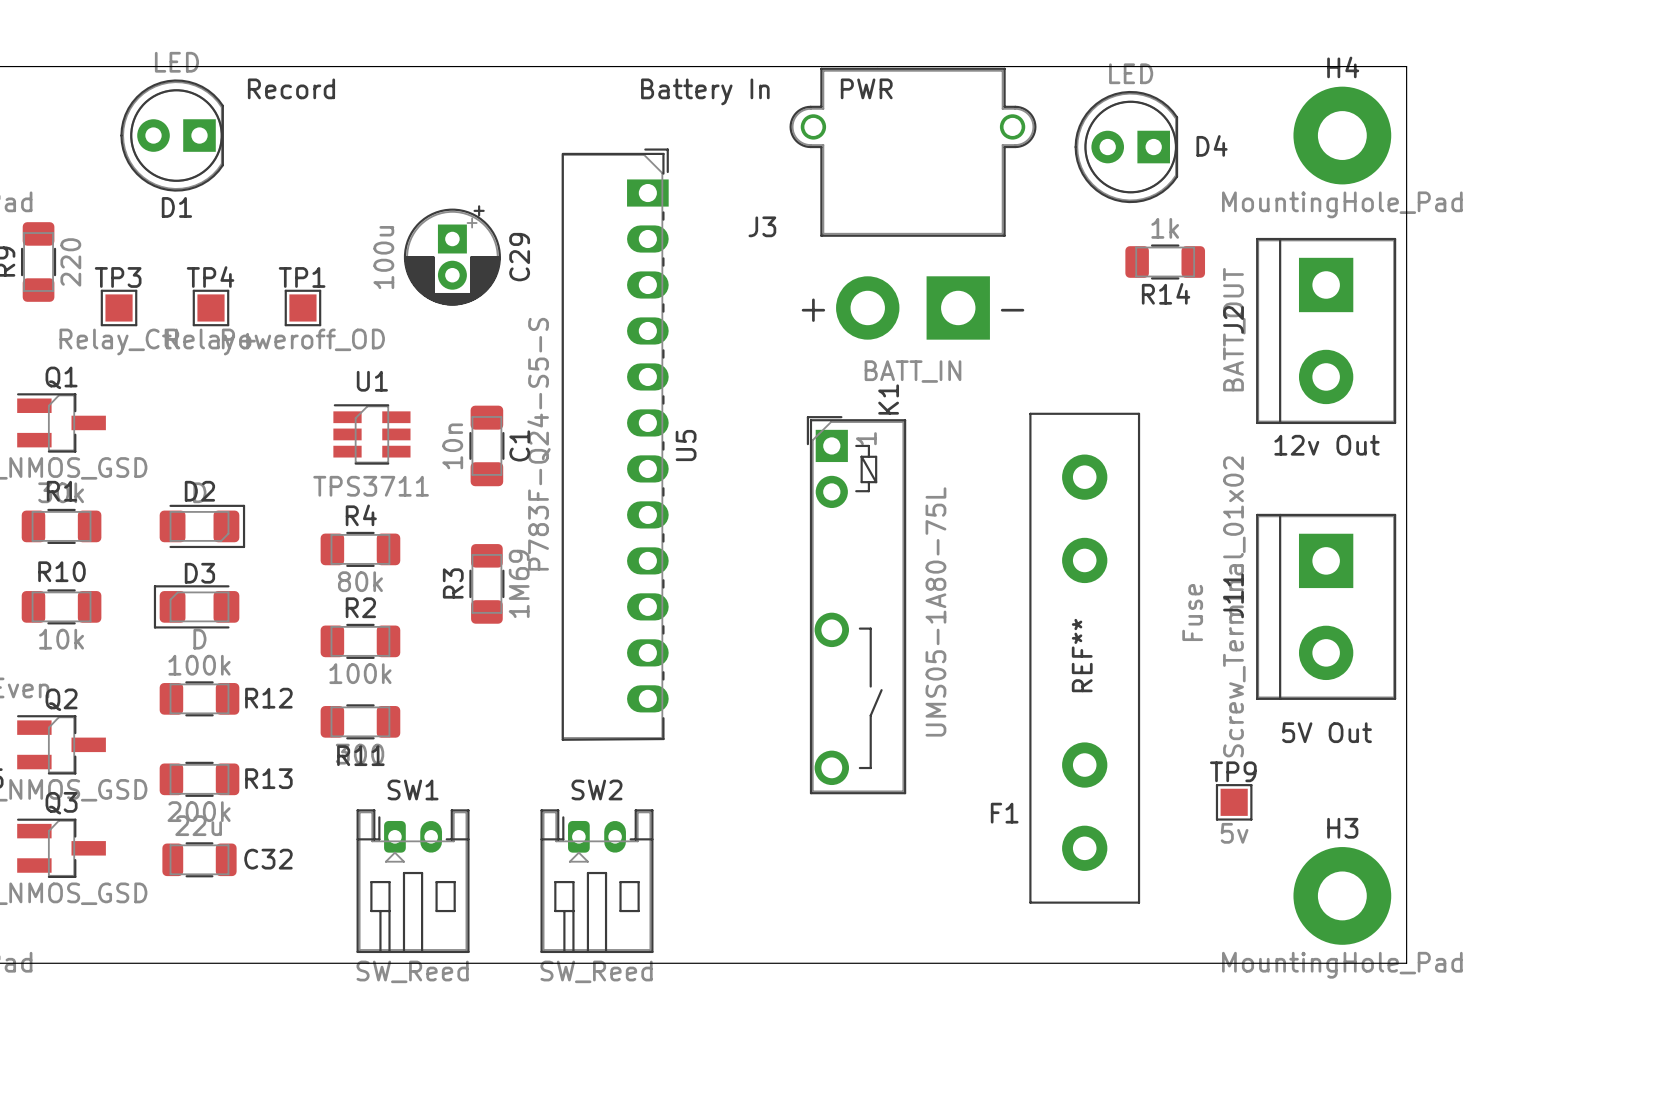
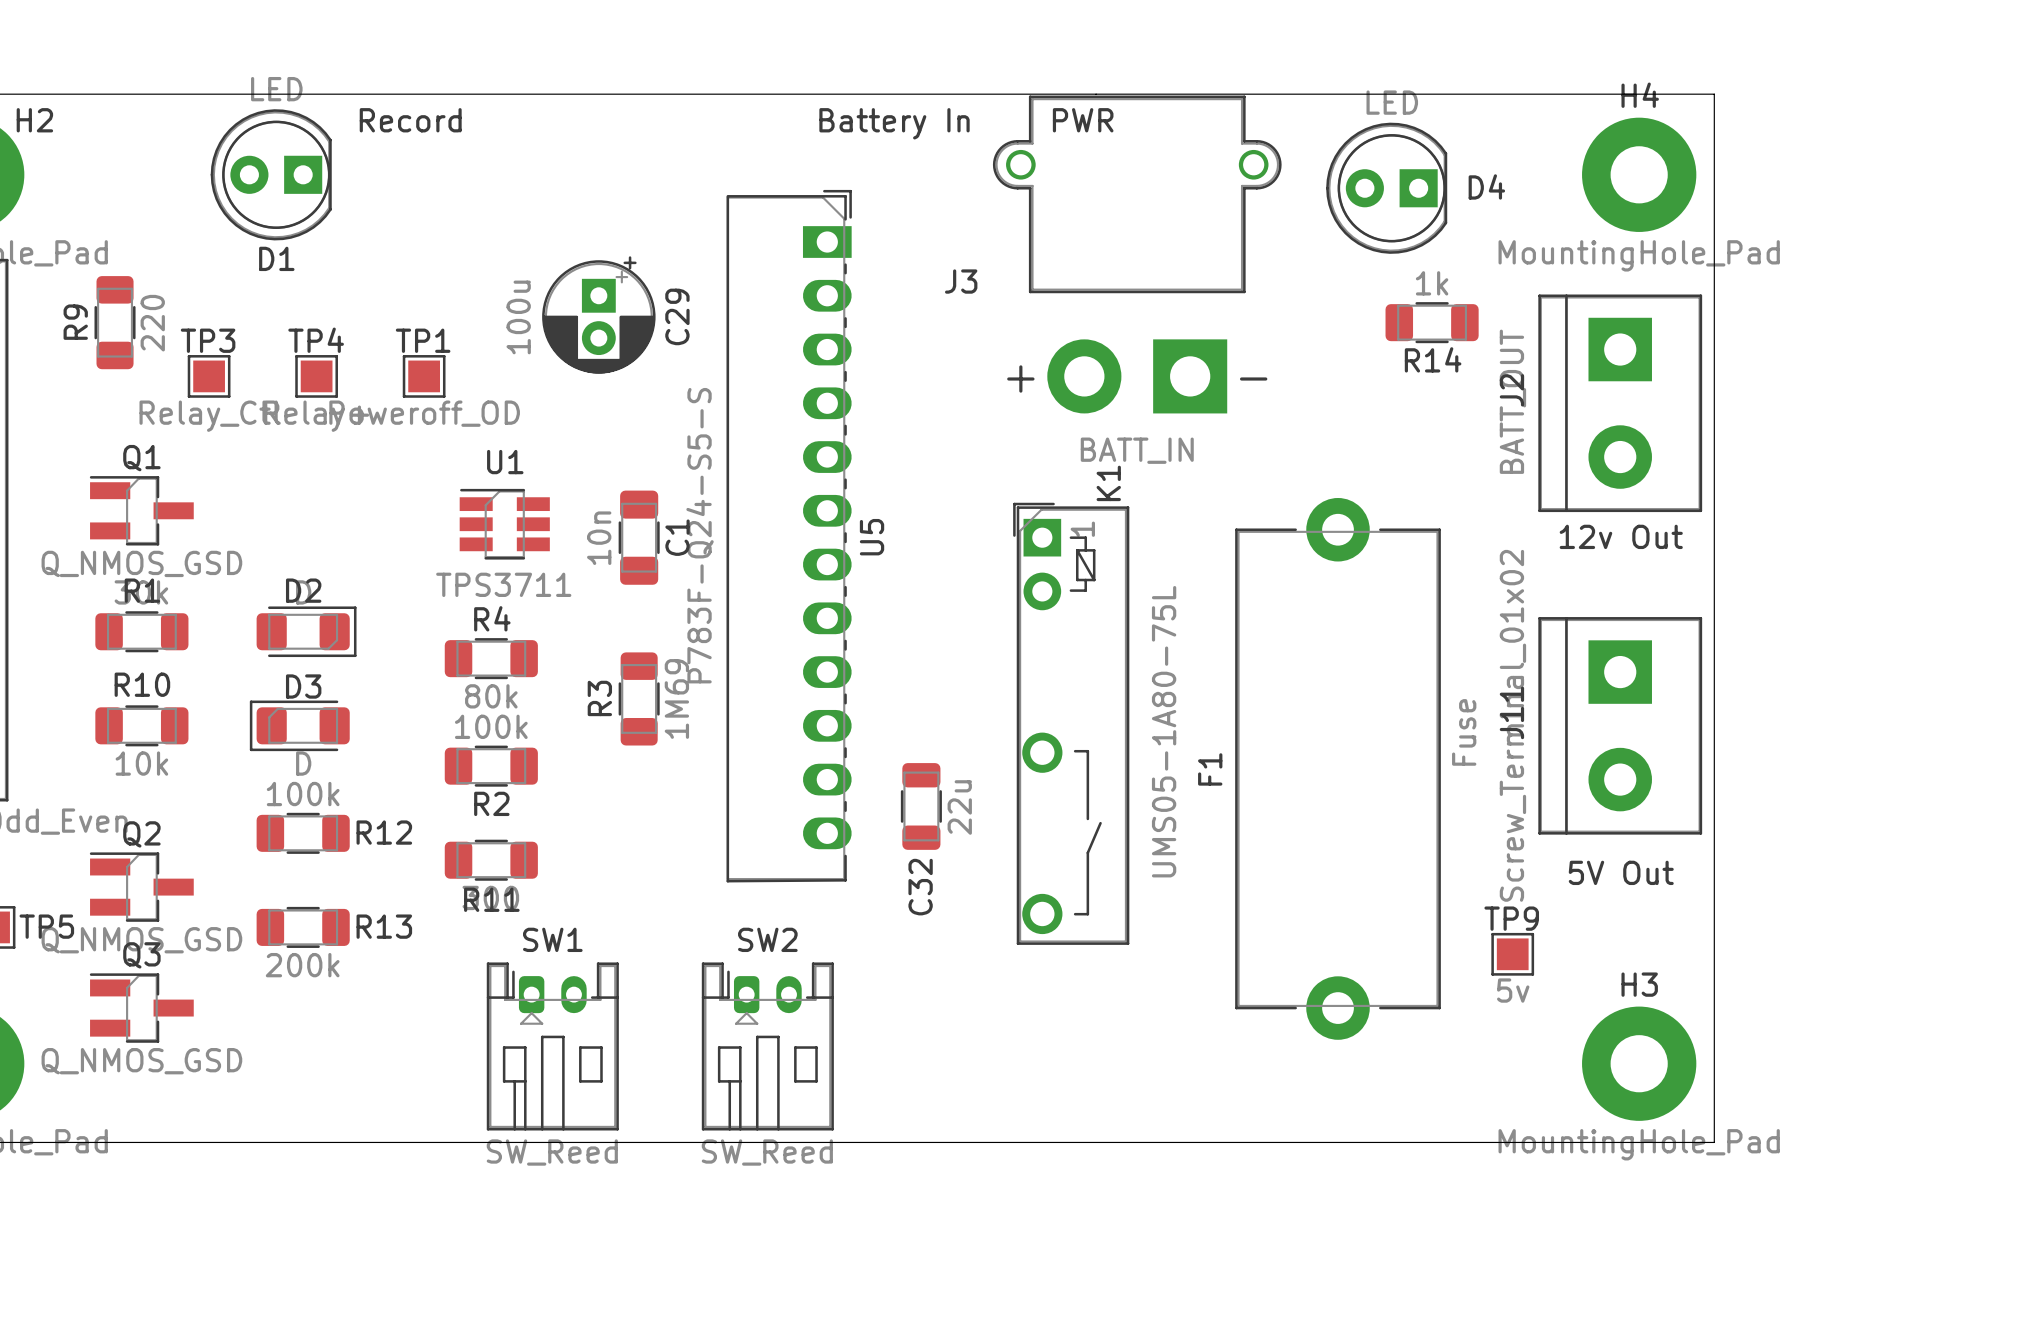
F1 footprint: [1029, 412, 1141, 904] -> [1235, 497, 1441, 1040]
R2 name position: R2 (360, 607) -> R2 (491, 803)
R2 value position: 100k (360, 673) -> 100k (491, 726)
F1 name position: F1 (1004, 813) -> F1 (1210, 769)
C32 rotation: 0° (199, 859) -> 90° clockwise (921, 806)
C32 position: (199, 859) -> (921, 806)

